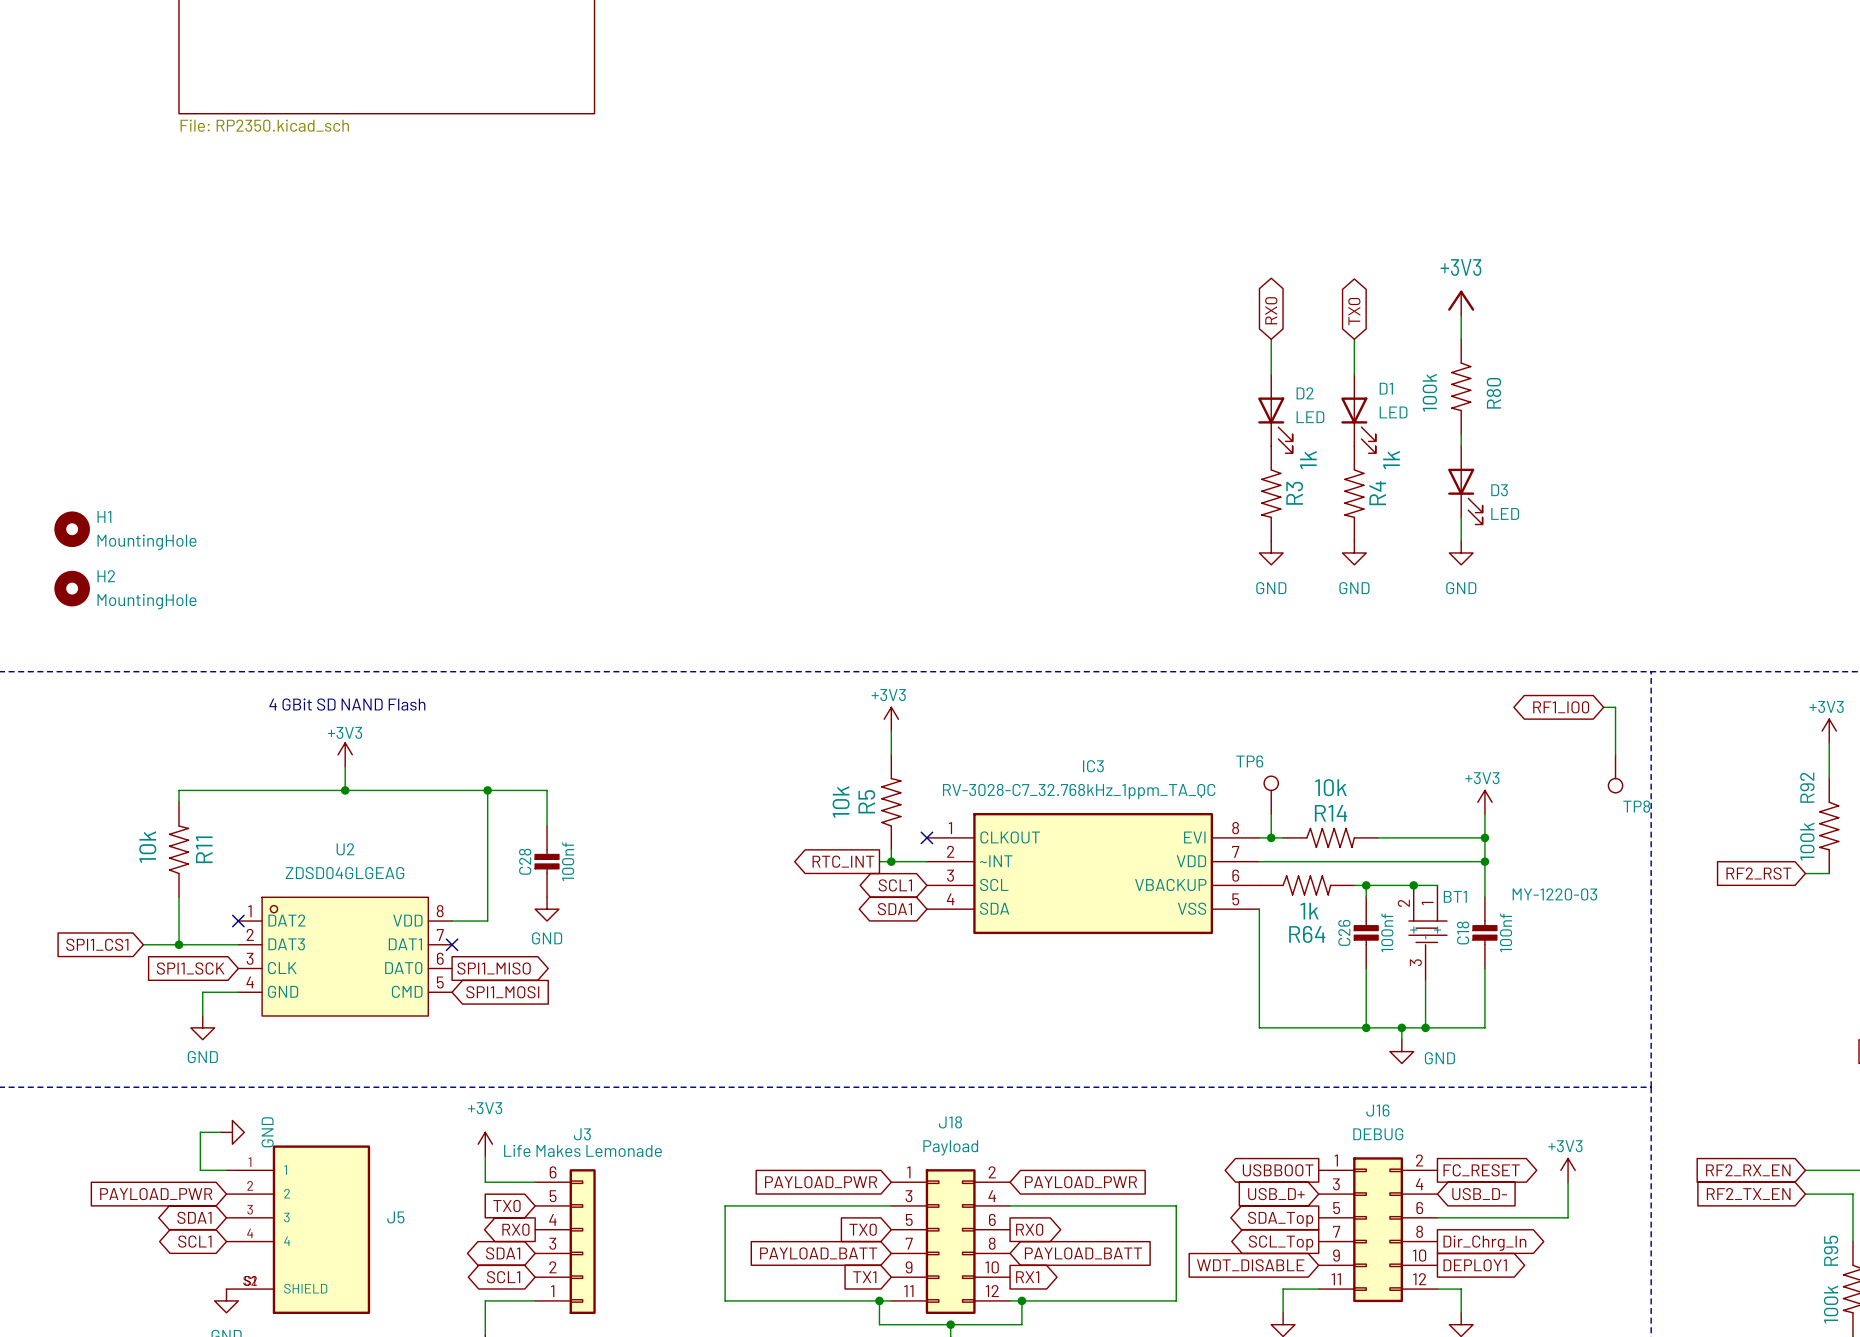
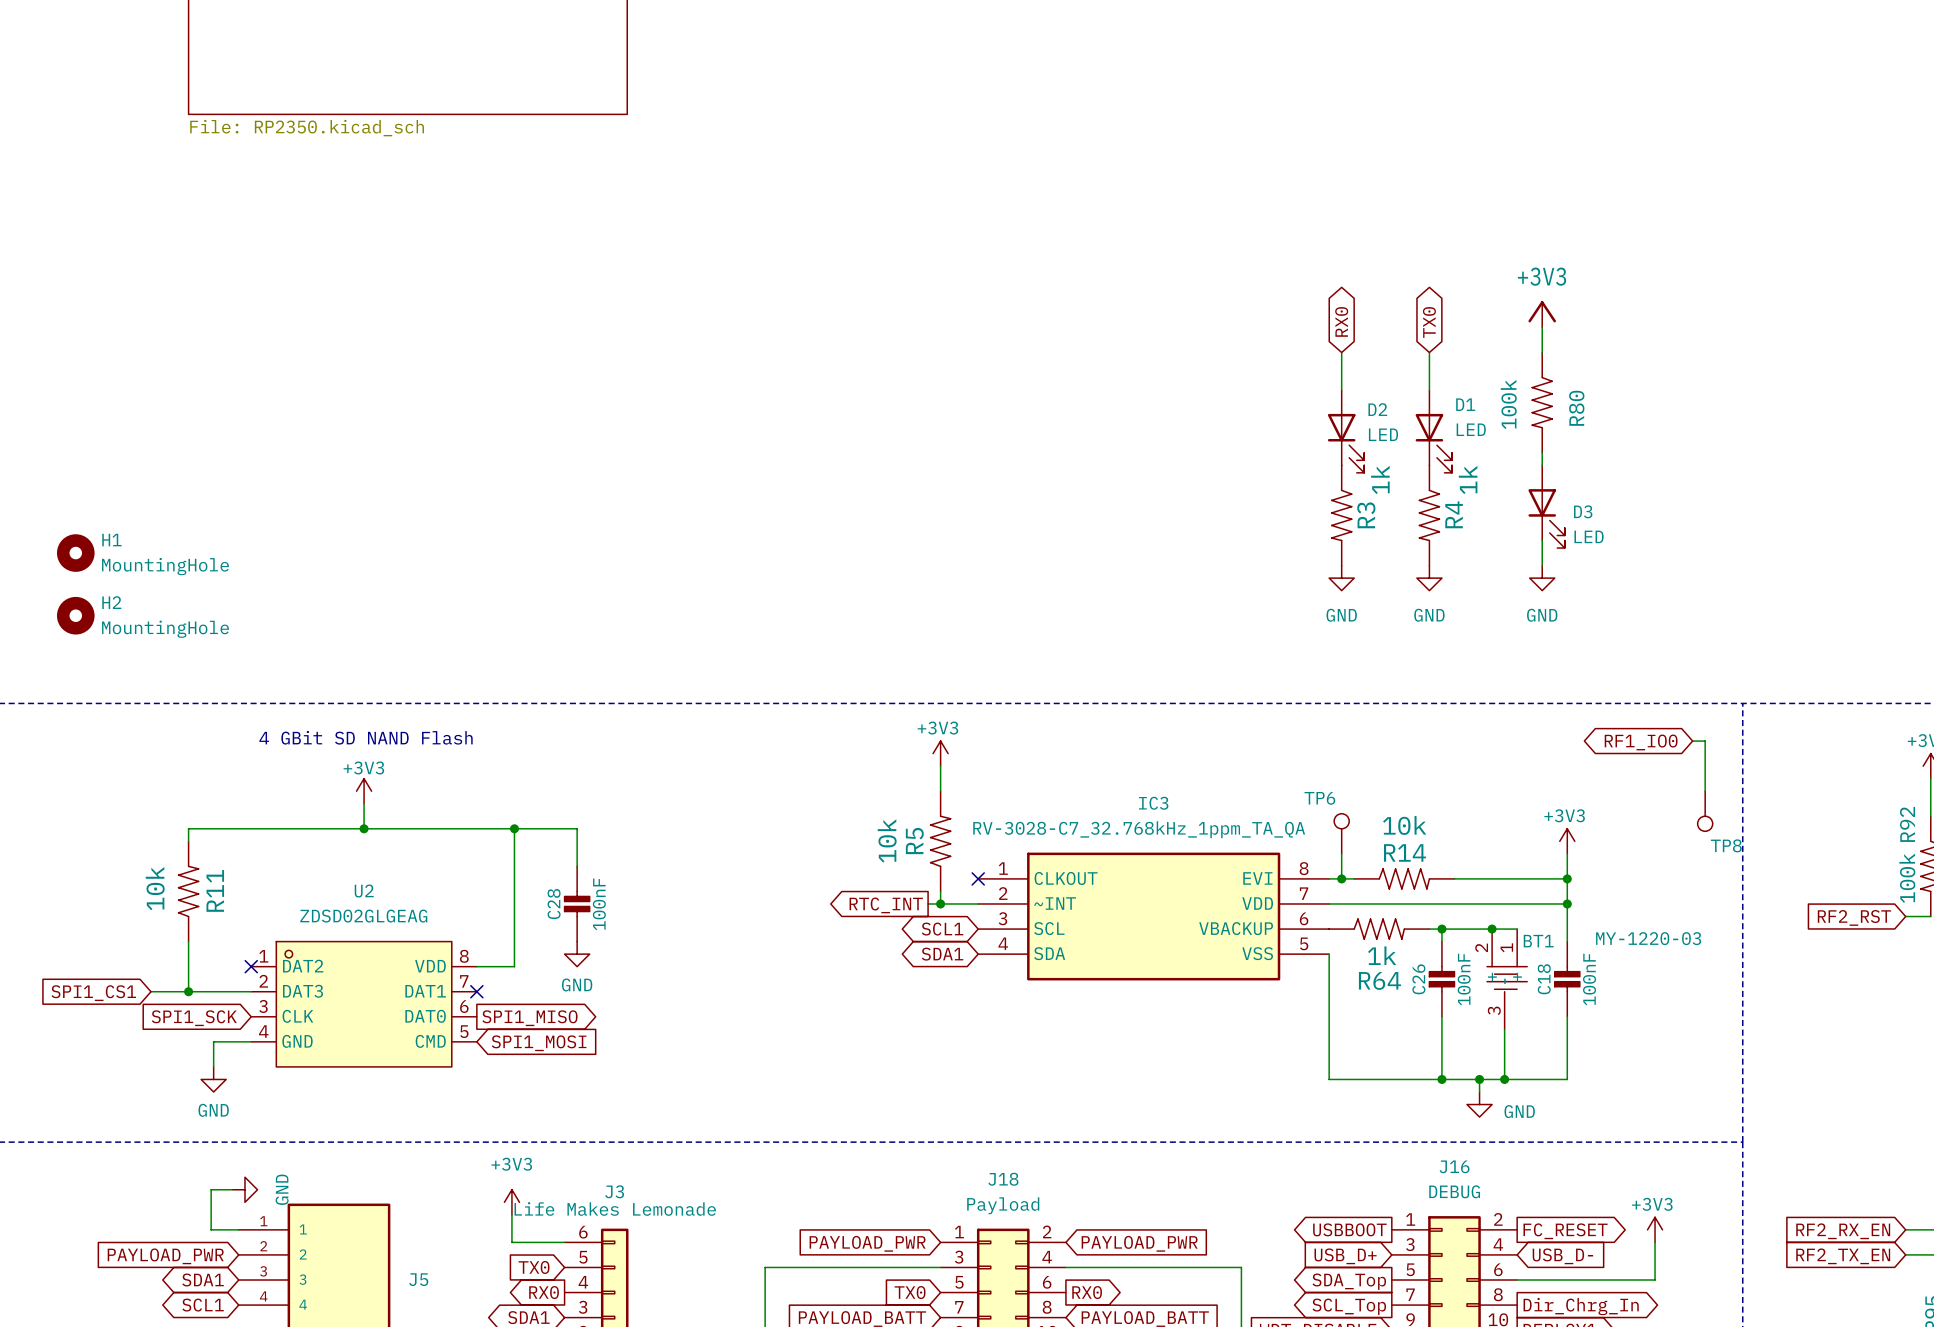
IC3 value: RV-3028-C7_32.768kHz_1ppm_TA_QC (1079, 791) -> RV-3028-C7_32.768kHz_1ppm_TA_QA (1139, 829)
C28 value: 100nf (568, 861) -> 100nF (599, 904)
U2 value: ZDSD04GLGEAG (344, 873) -> ZDSD02GLGEAG (363, 916)
C26 value: 100nf (1387, 932) -> 100nF (1464, 979)
C18 value: 100nf (1506, 932) -> 100nF (1589, 979)

